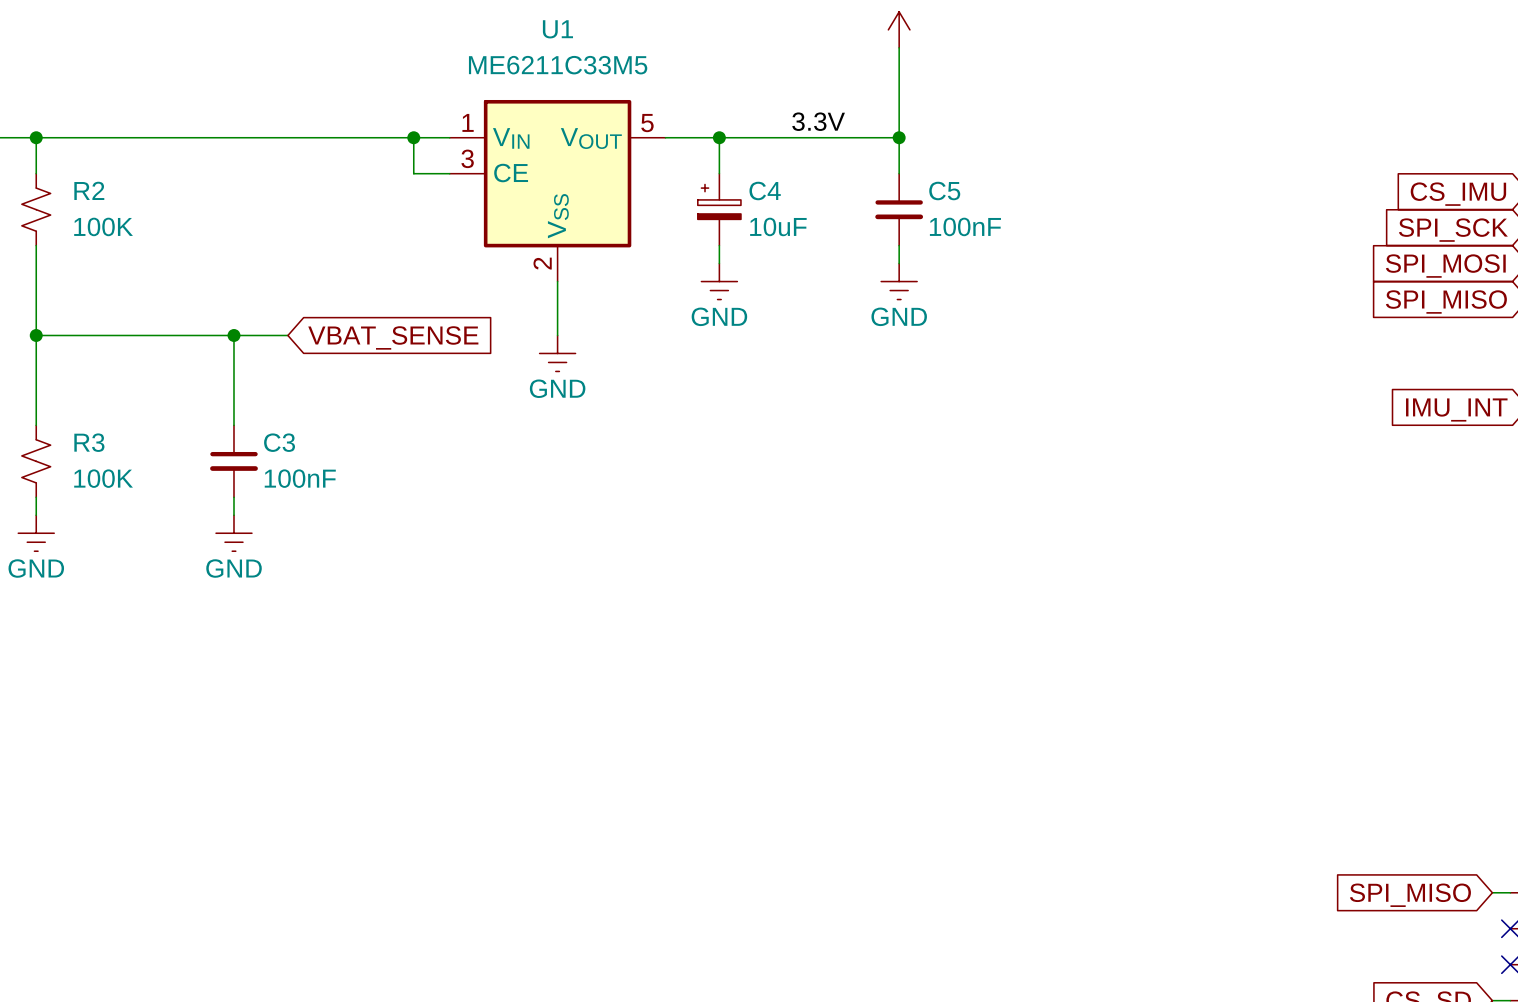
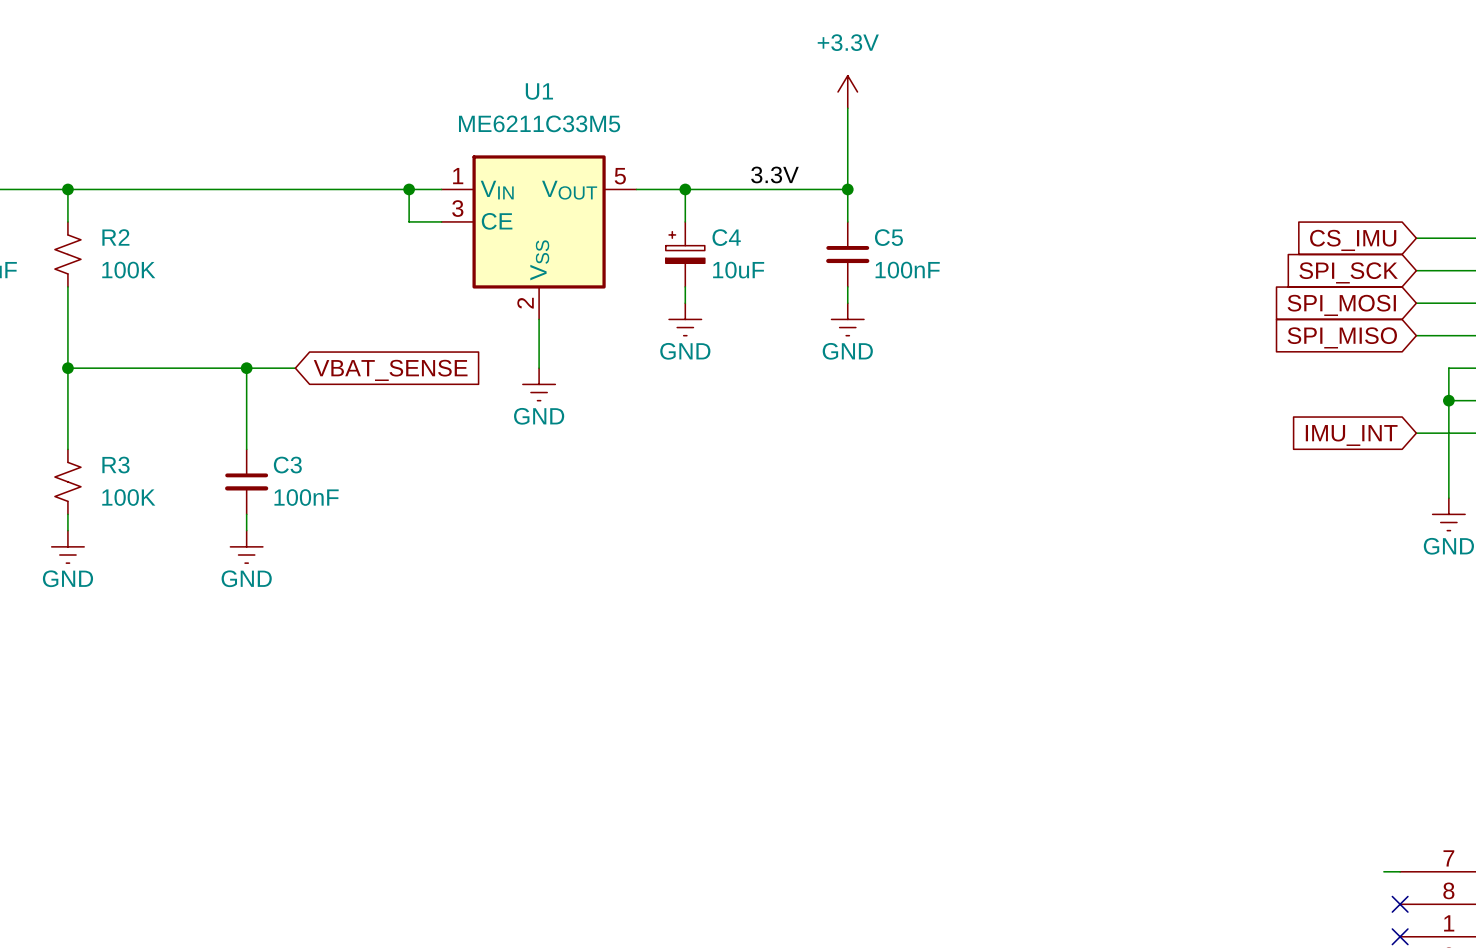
global label: SPI_MISO (1410, 895) -> none

